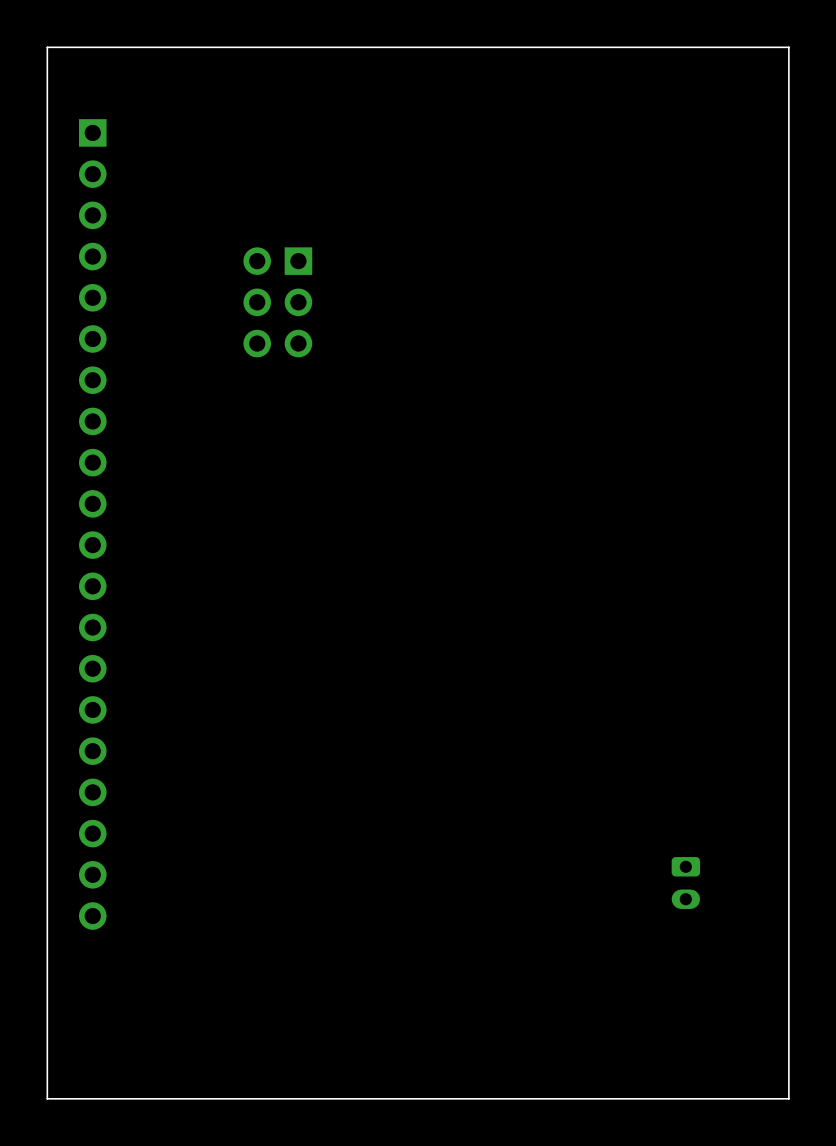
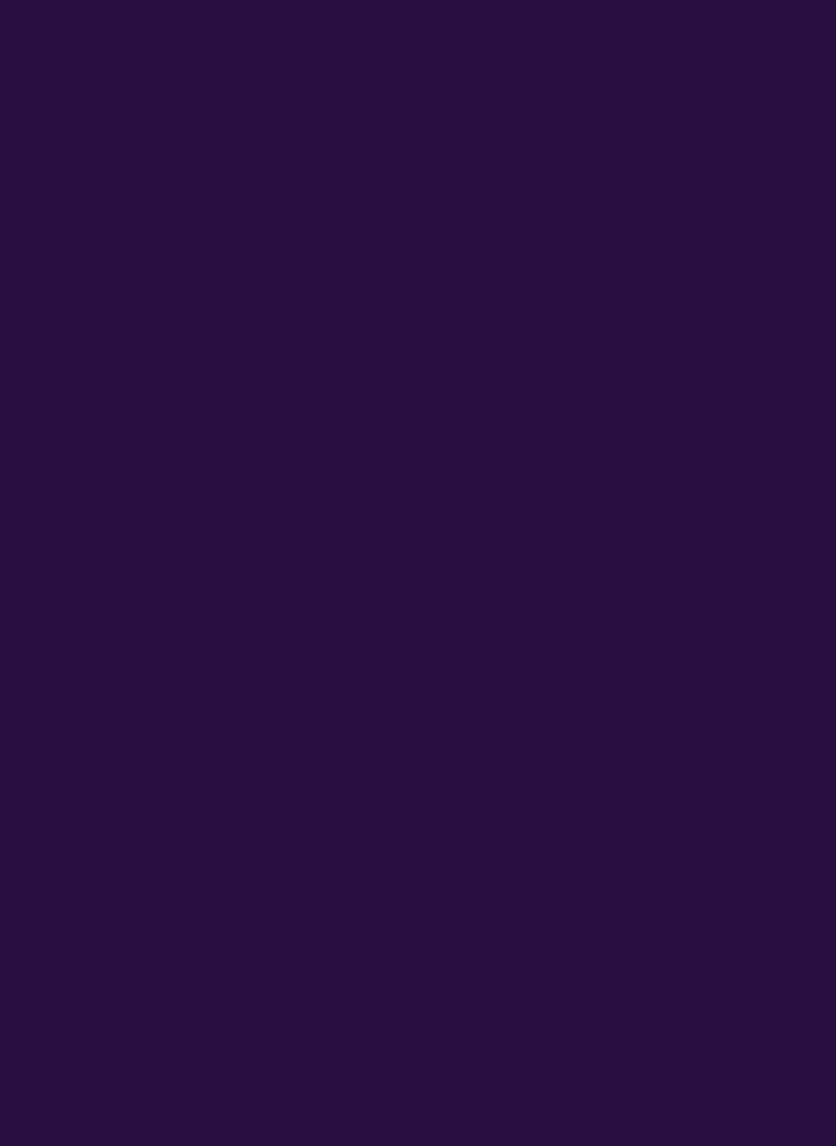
board edge: (788, 47) (47, 47) (47, 1098) (788, 1098) (788, 47) -> none
part: (277, 302) -> none
part: (92, 524) -> none
part: (685, 883) -> none

